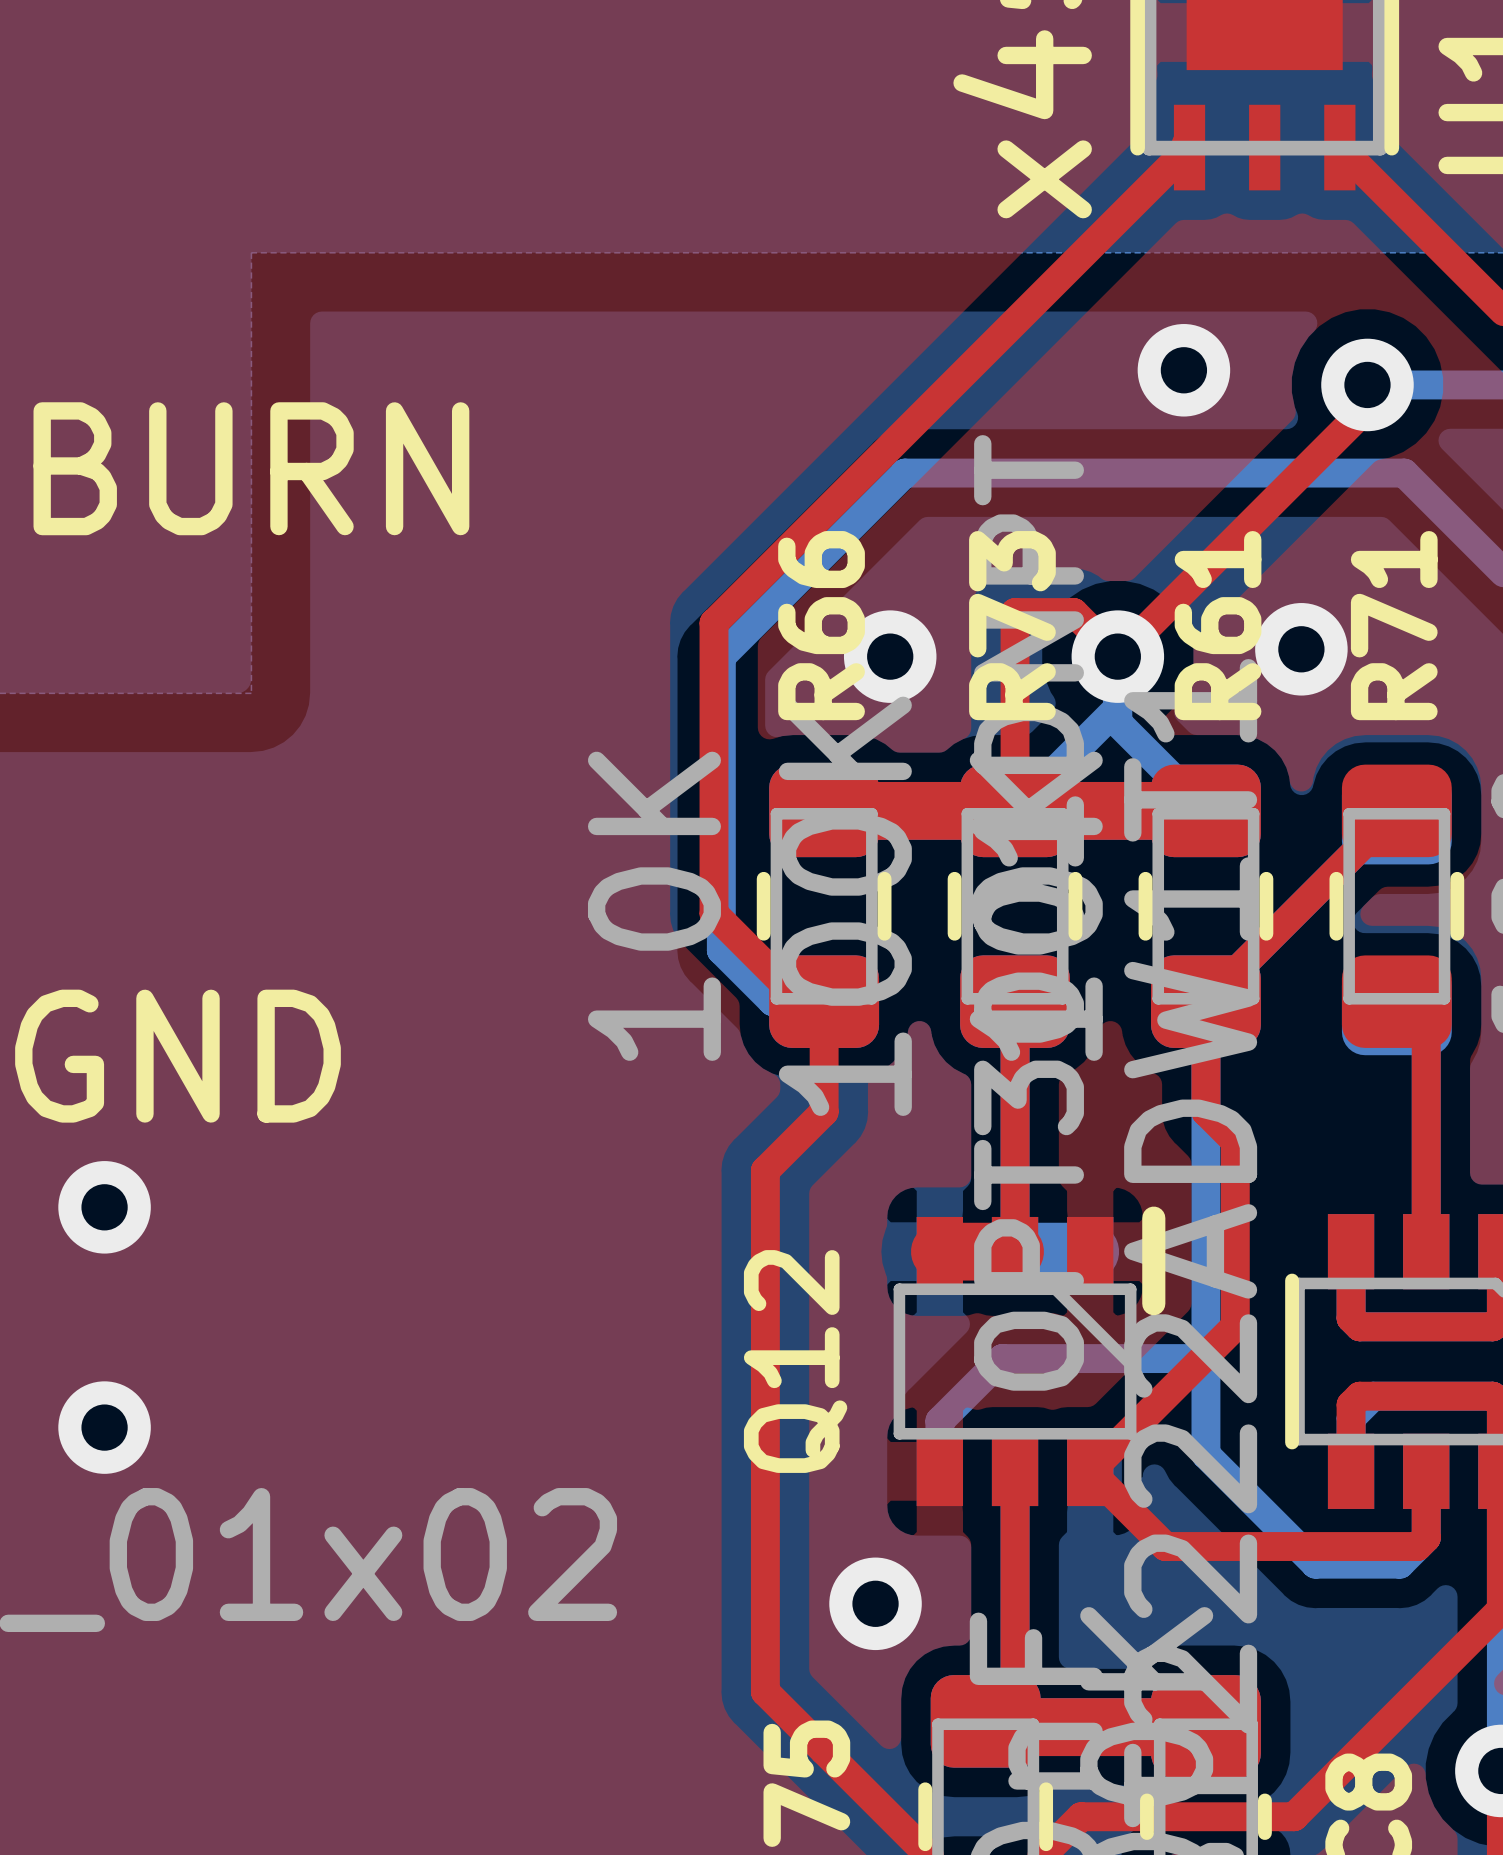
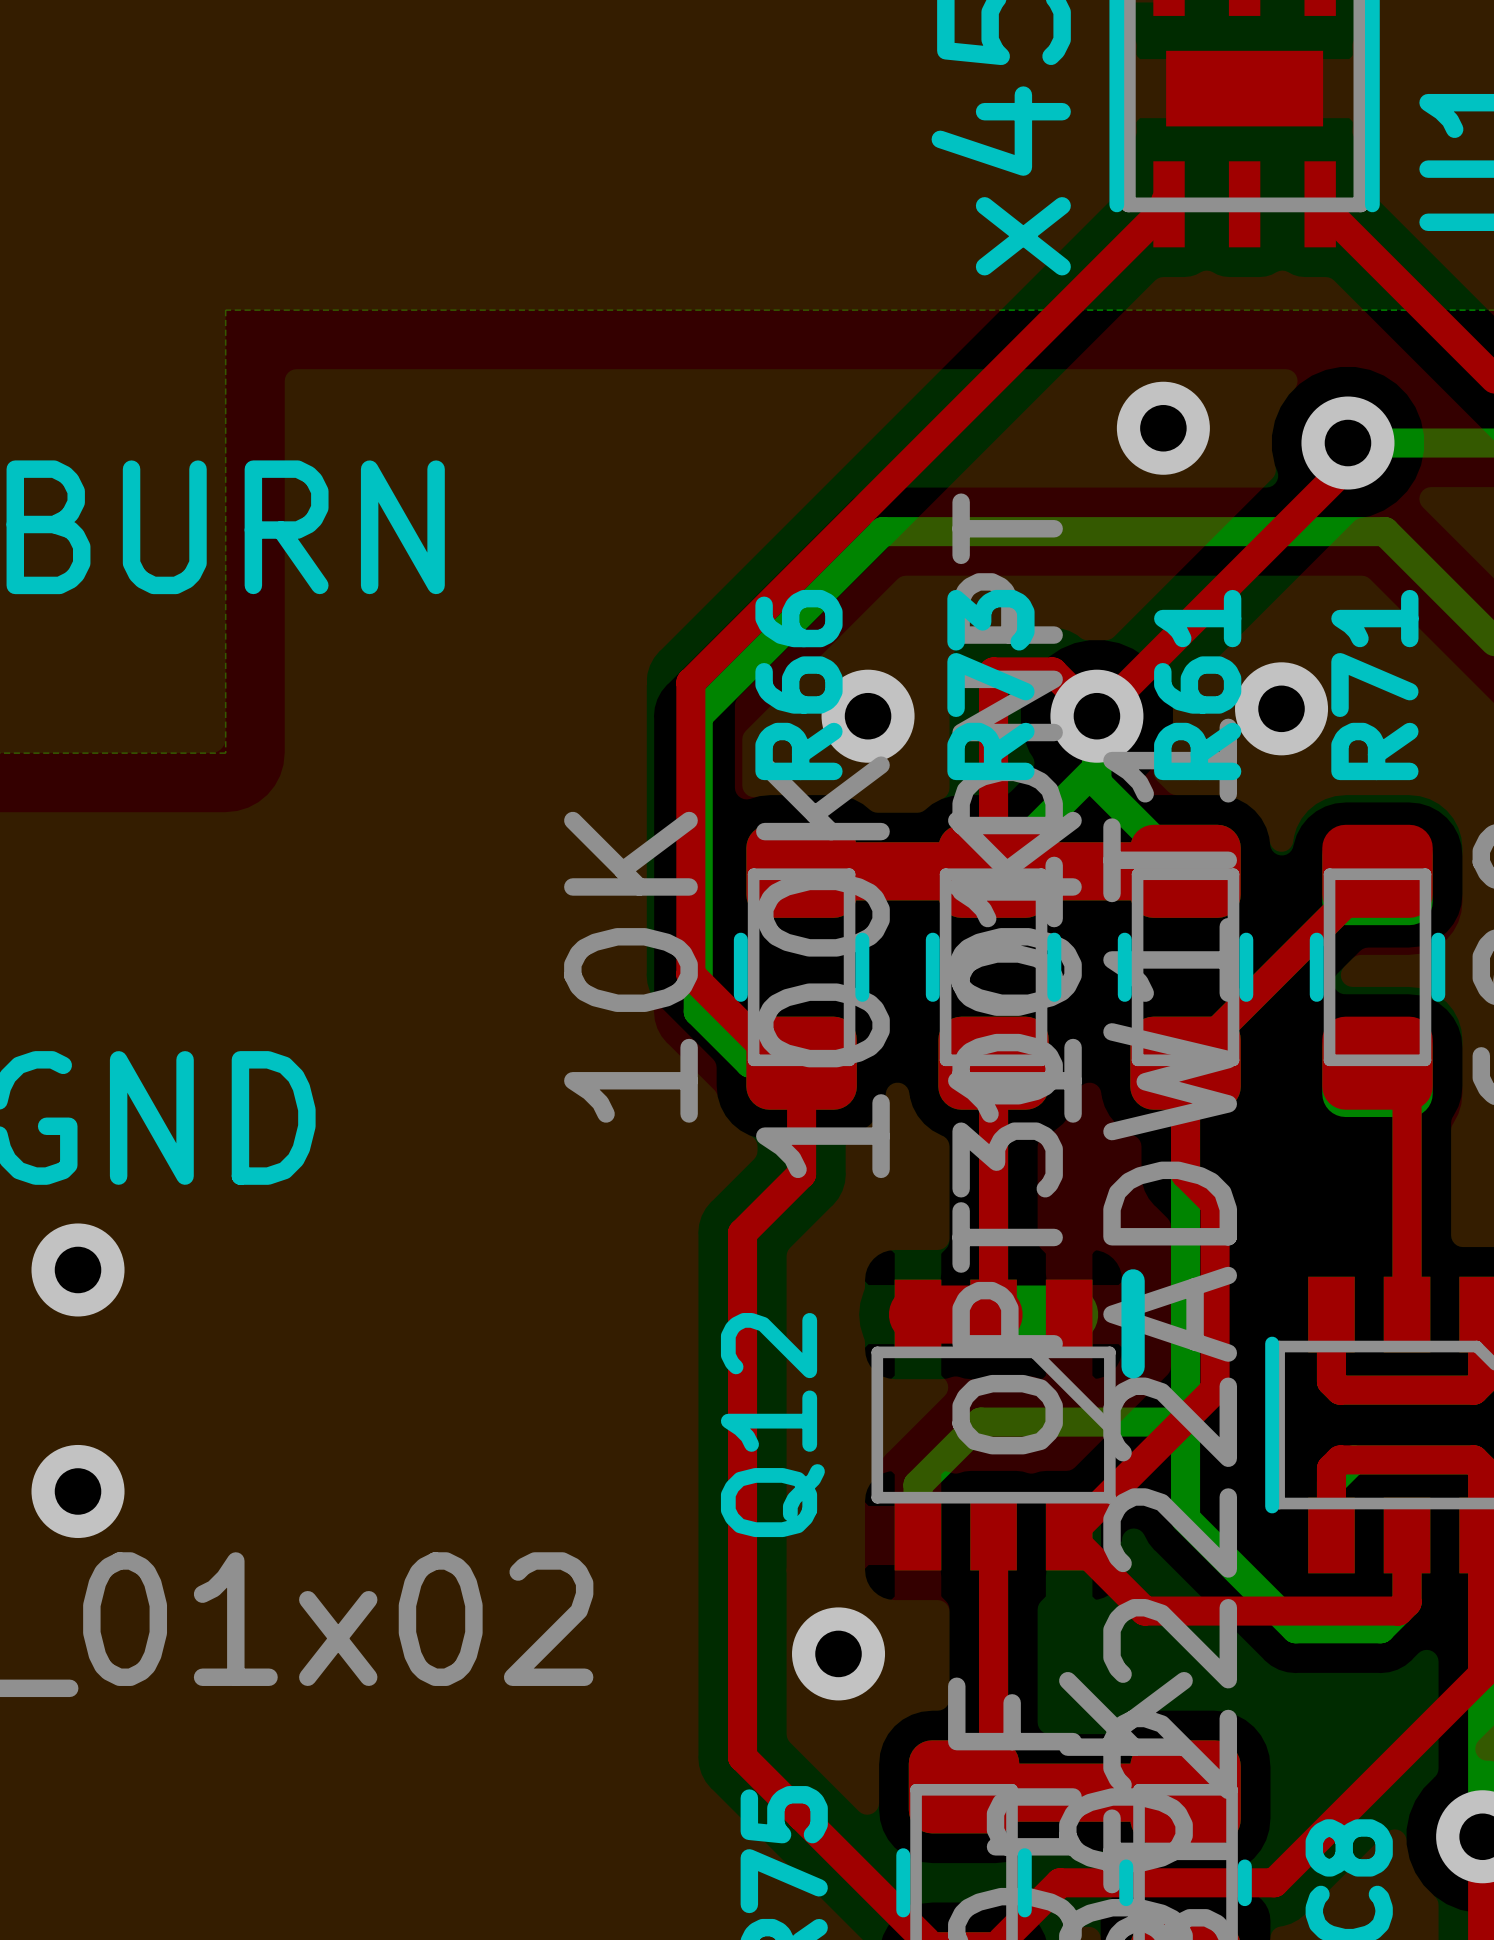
via position: (875, 1603) -> (838, 1653)

